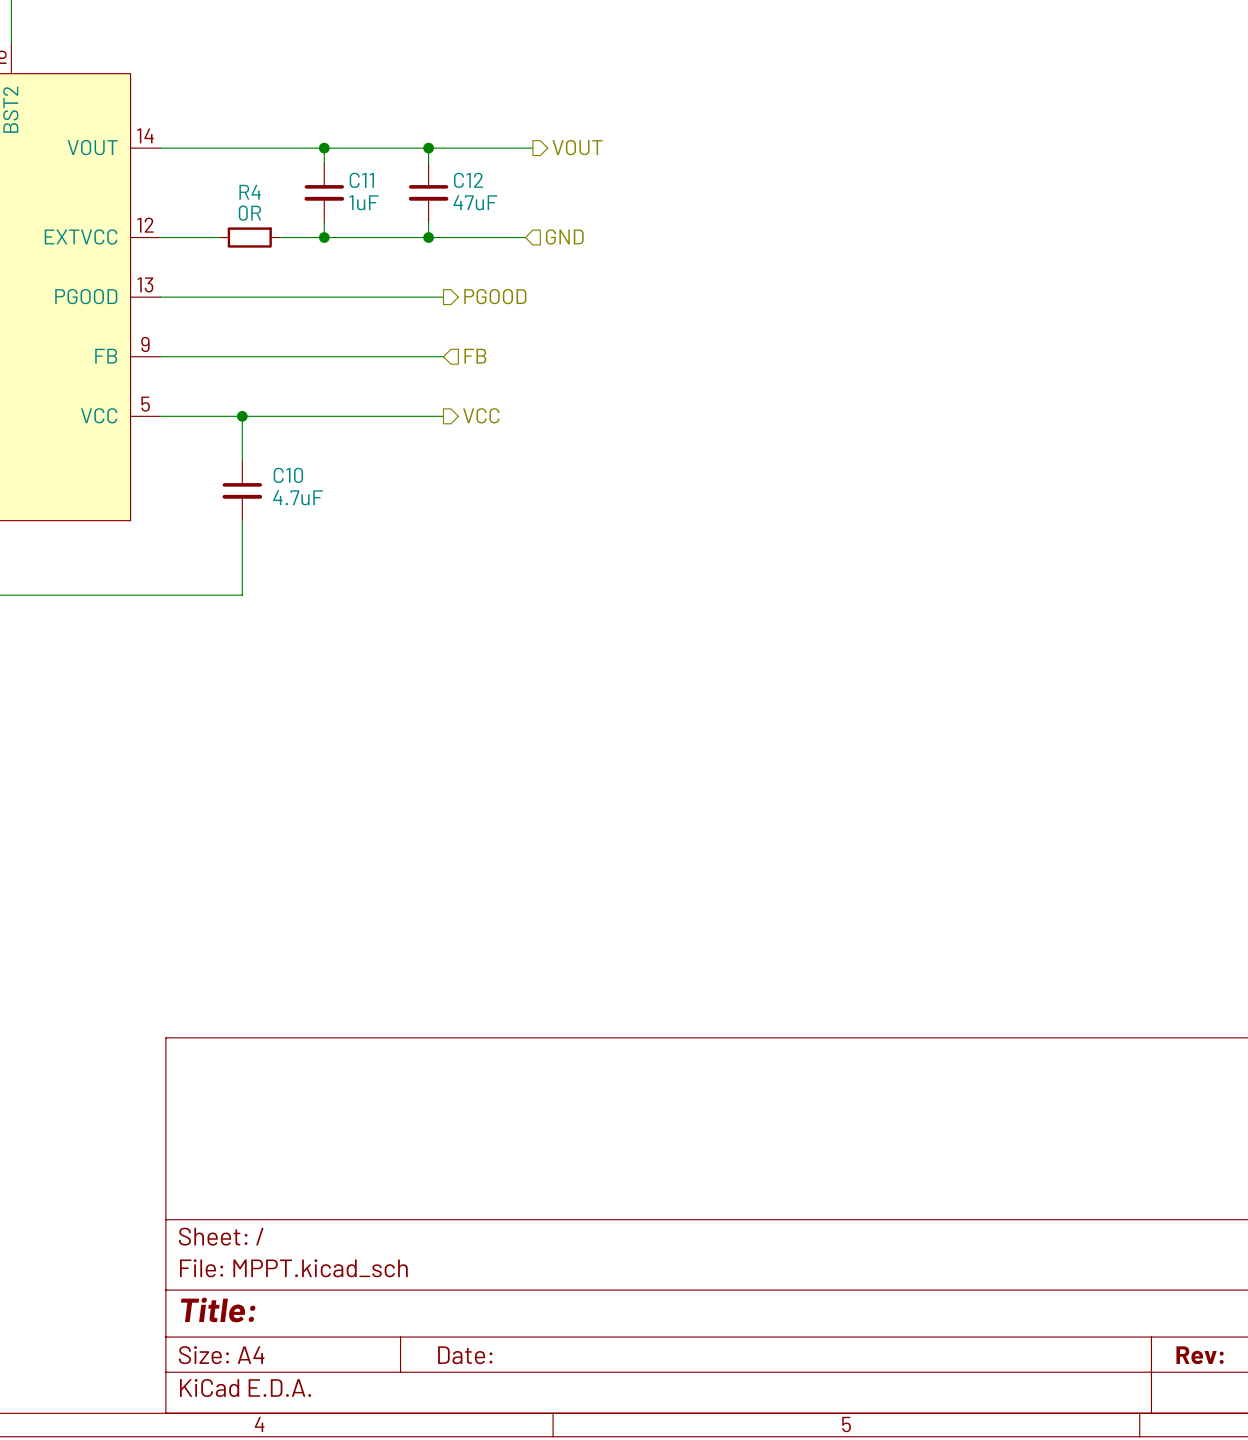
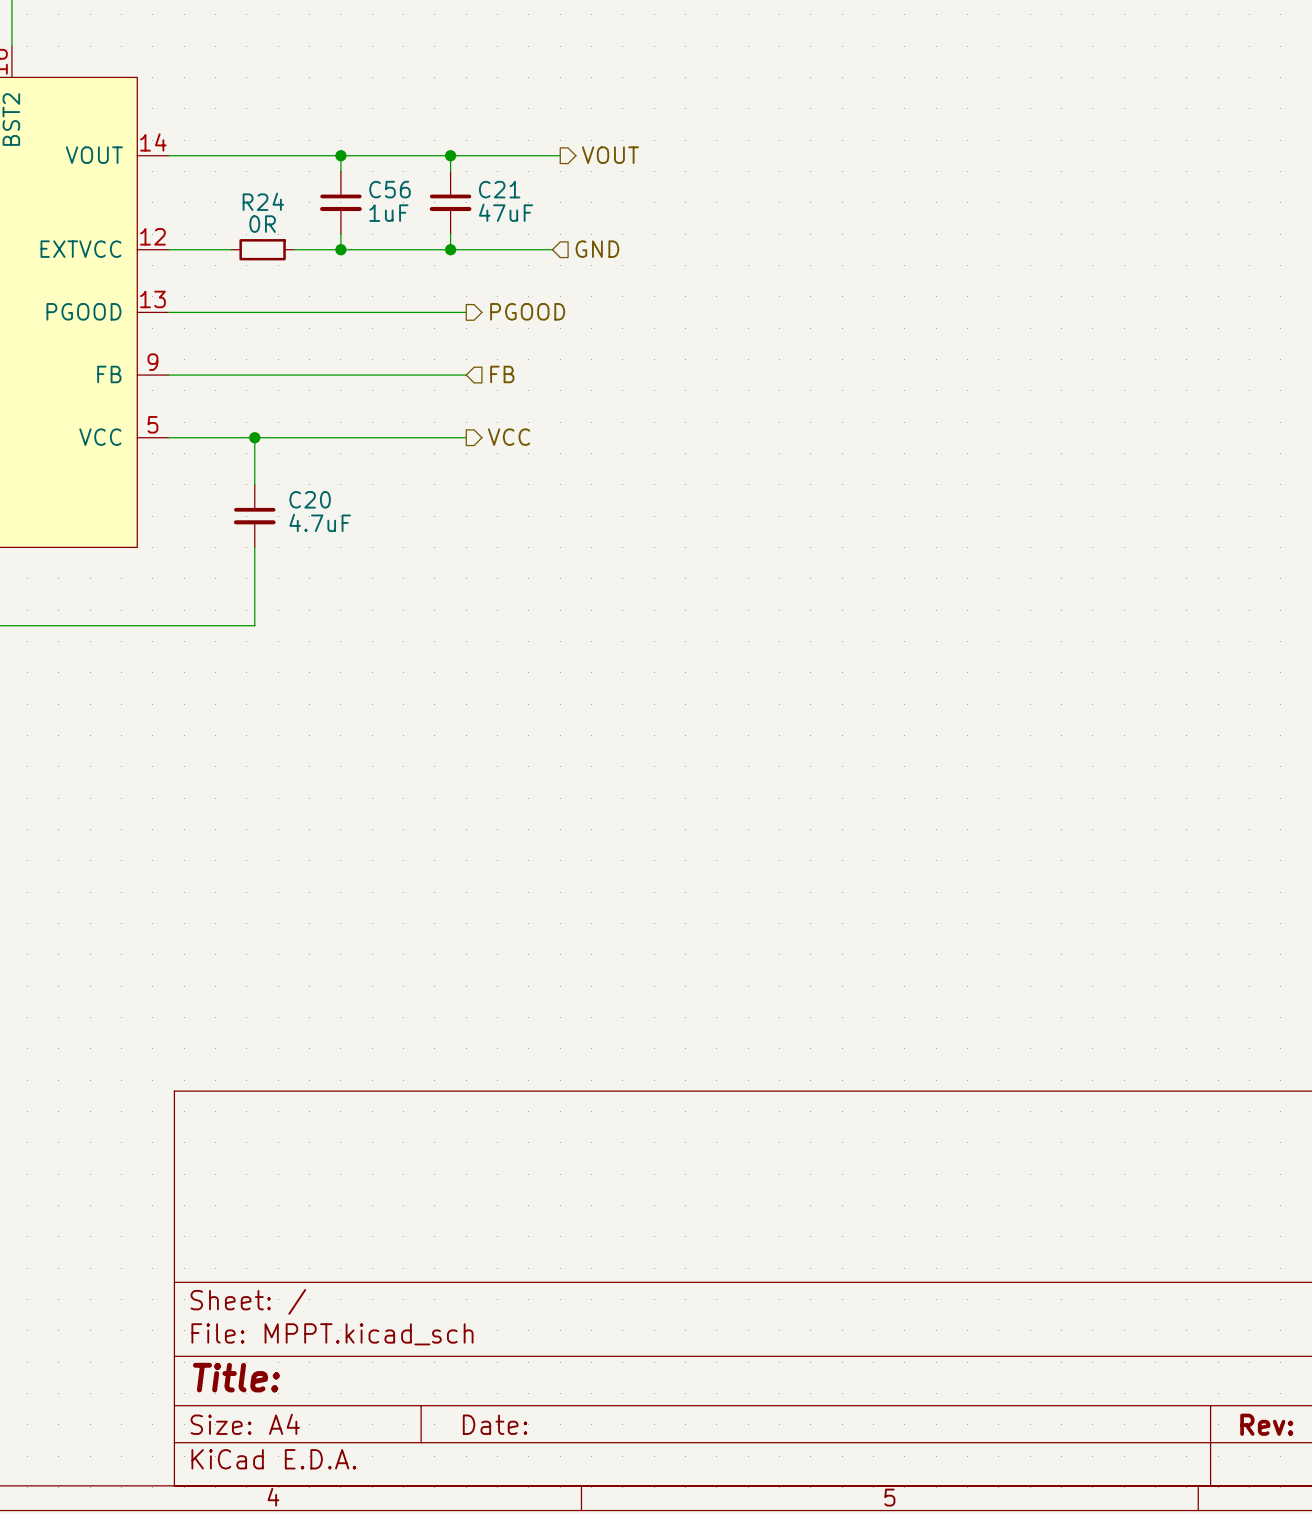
C11 name: C11 (361, 180) -> C56 (389, 189)
C12 name: C12 (468, 180) -> C21 (499, 189)
R4 name: R4 (250, 192) -> R24 (263, 201)
C10 name: C10 (288, 475) -> C20 (310, 499)

